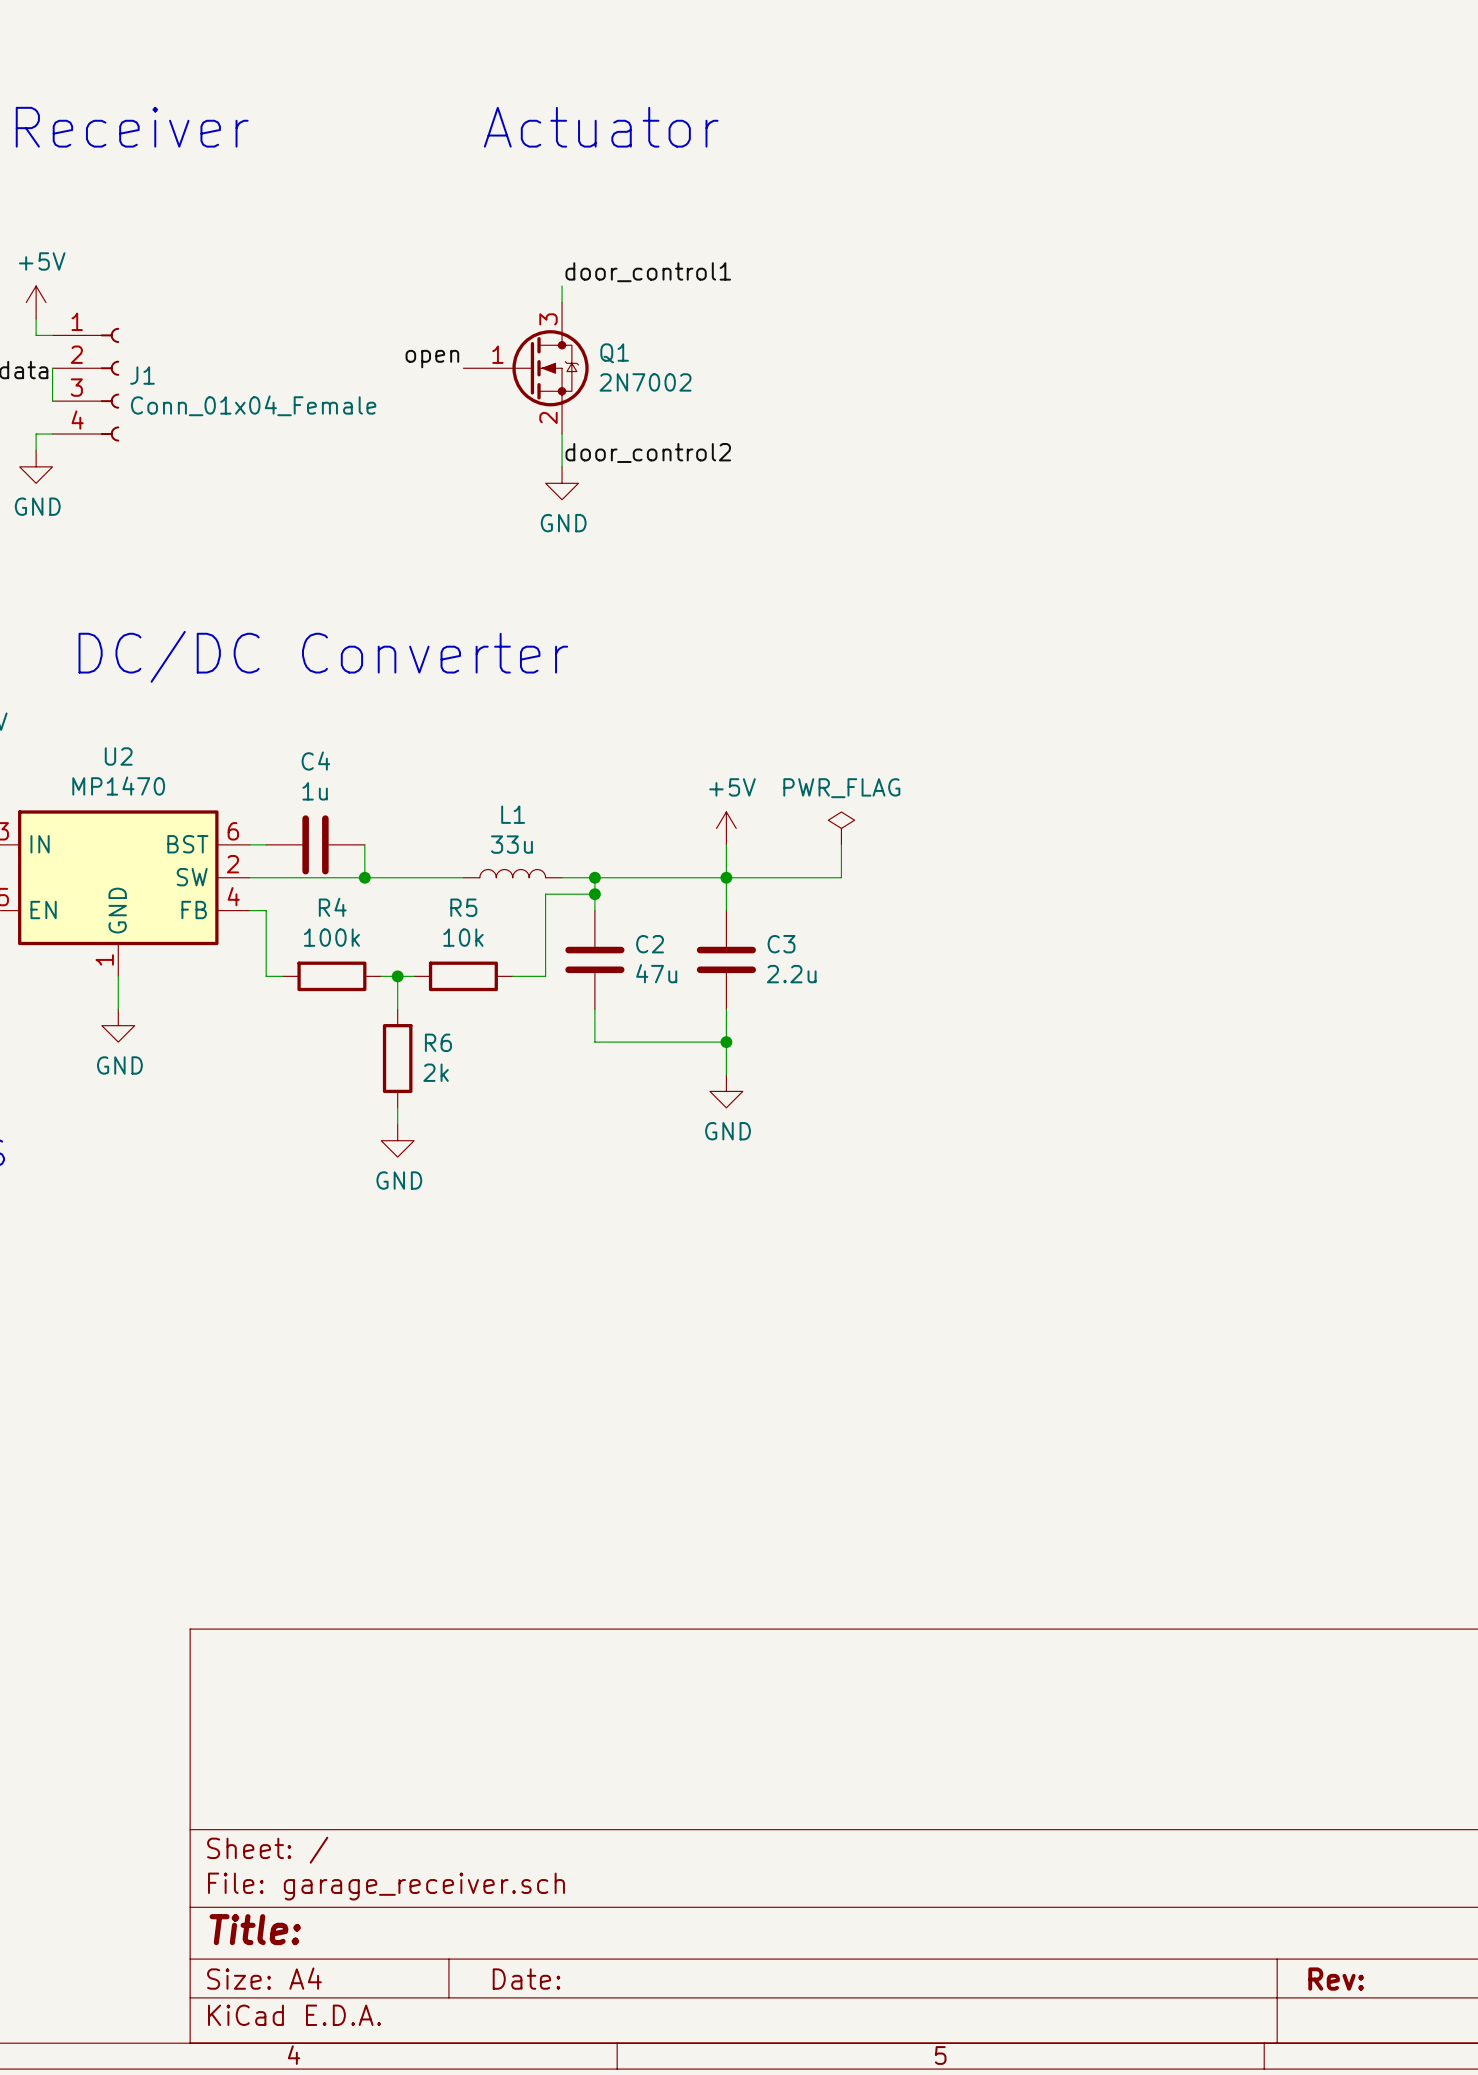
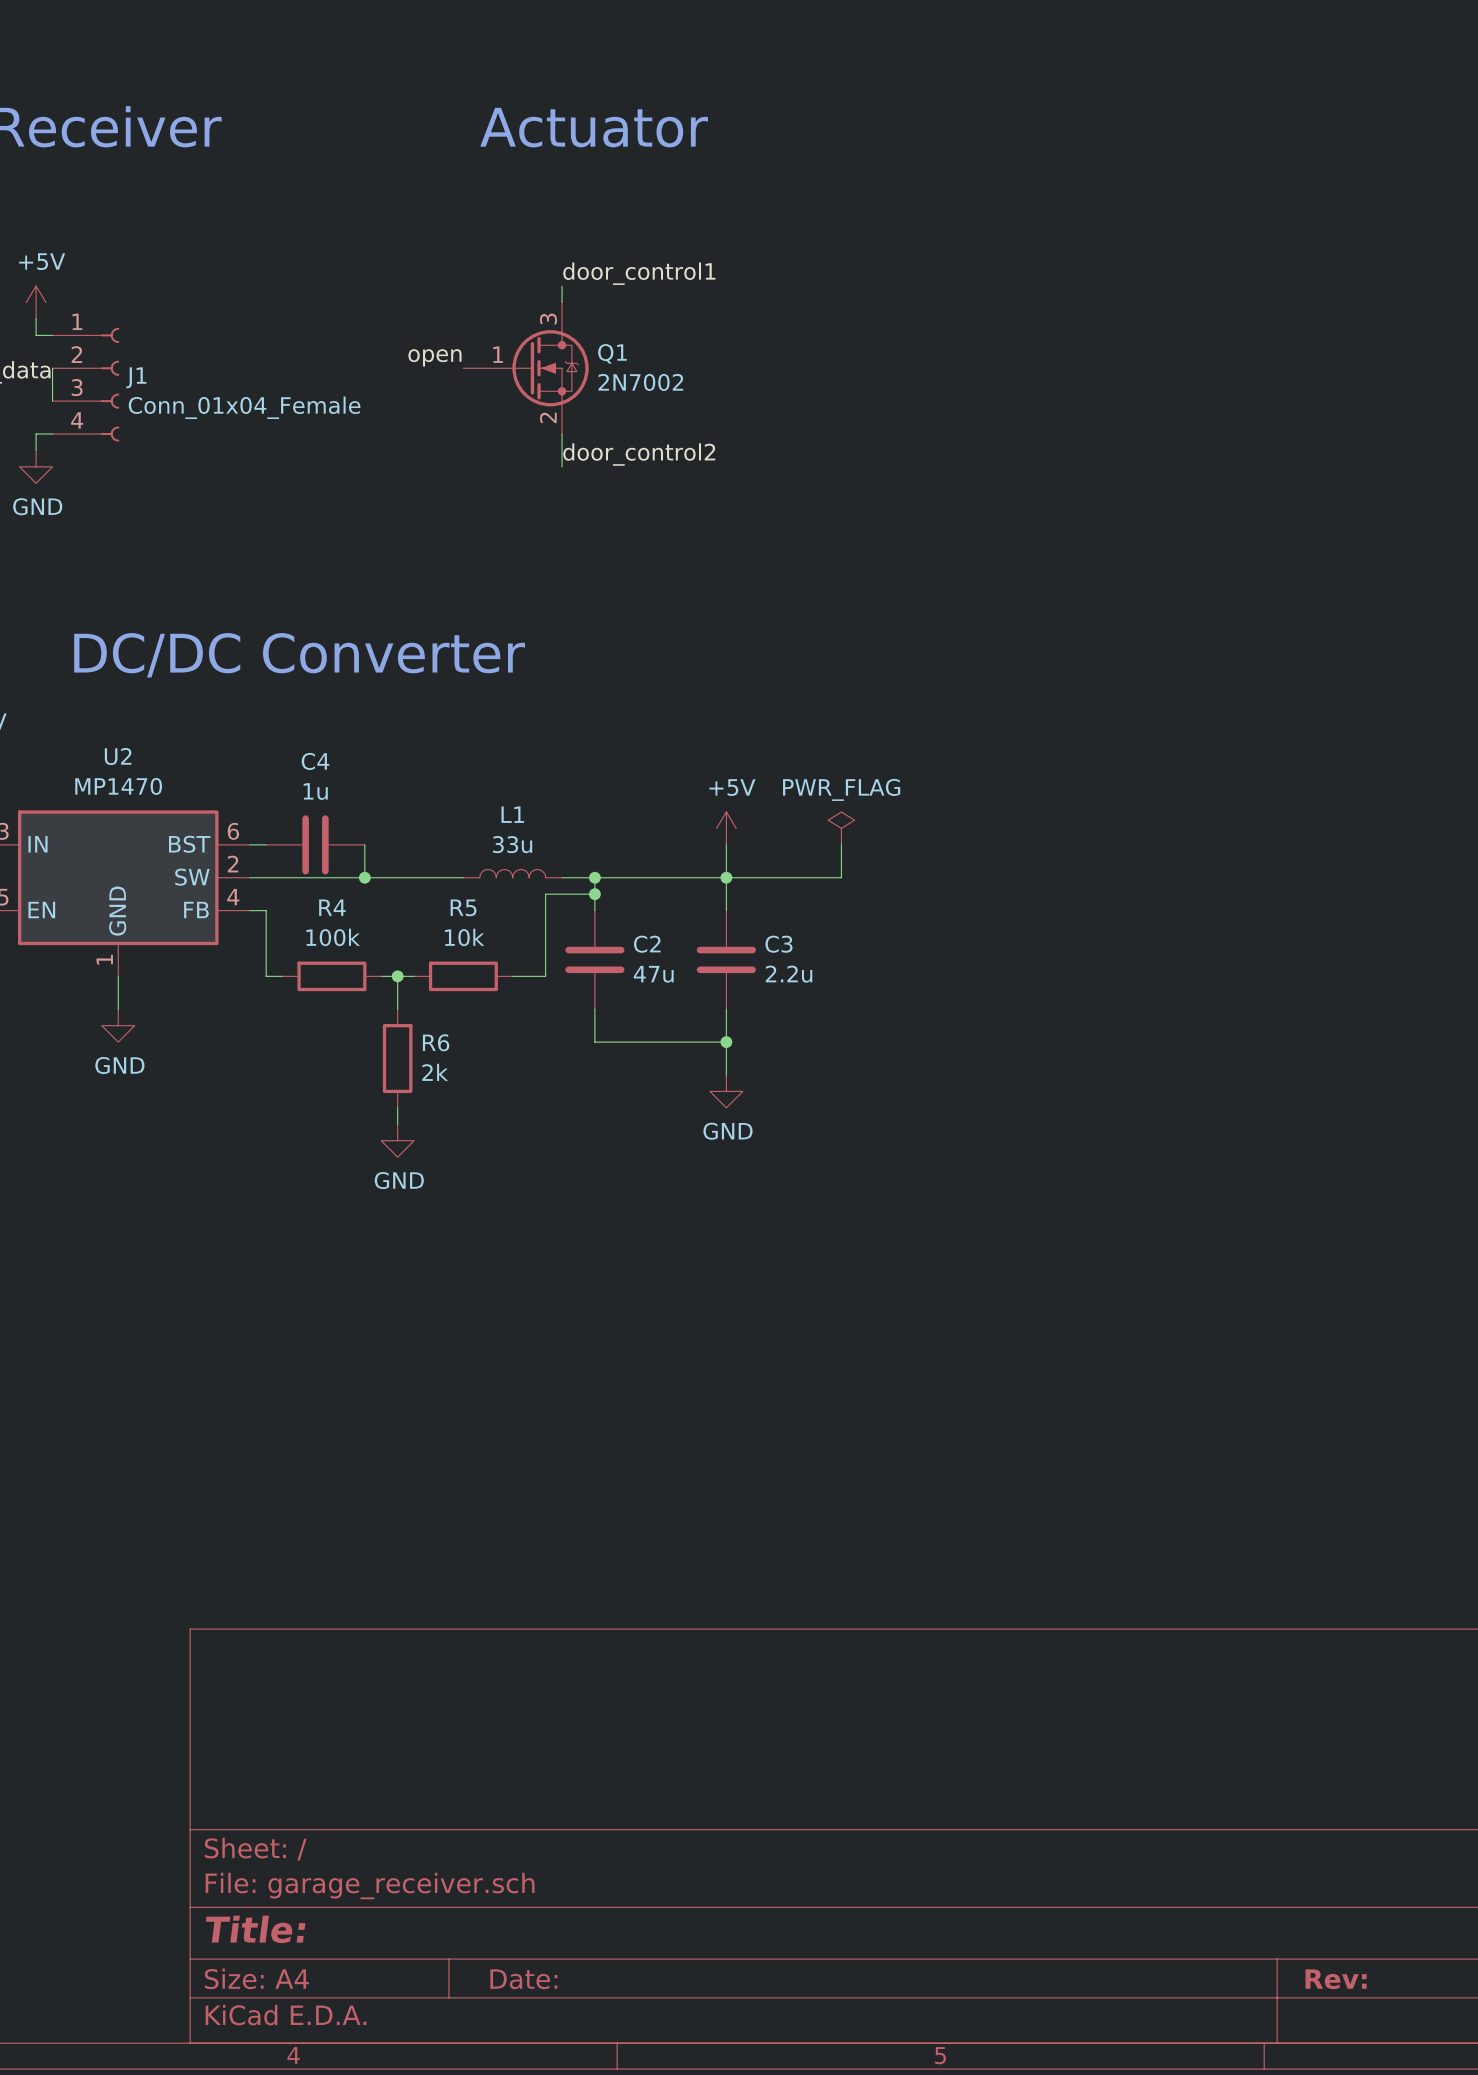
power symbol: GND (562, 483) -> none

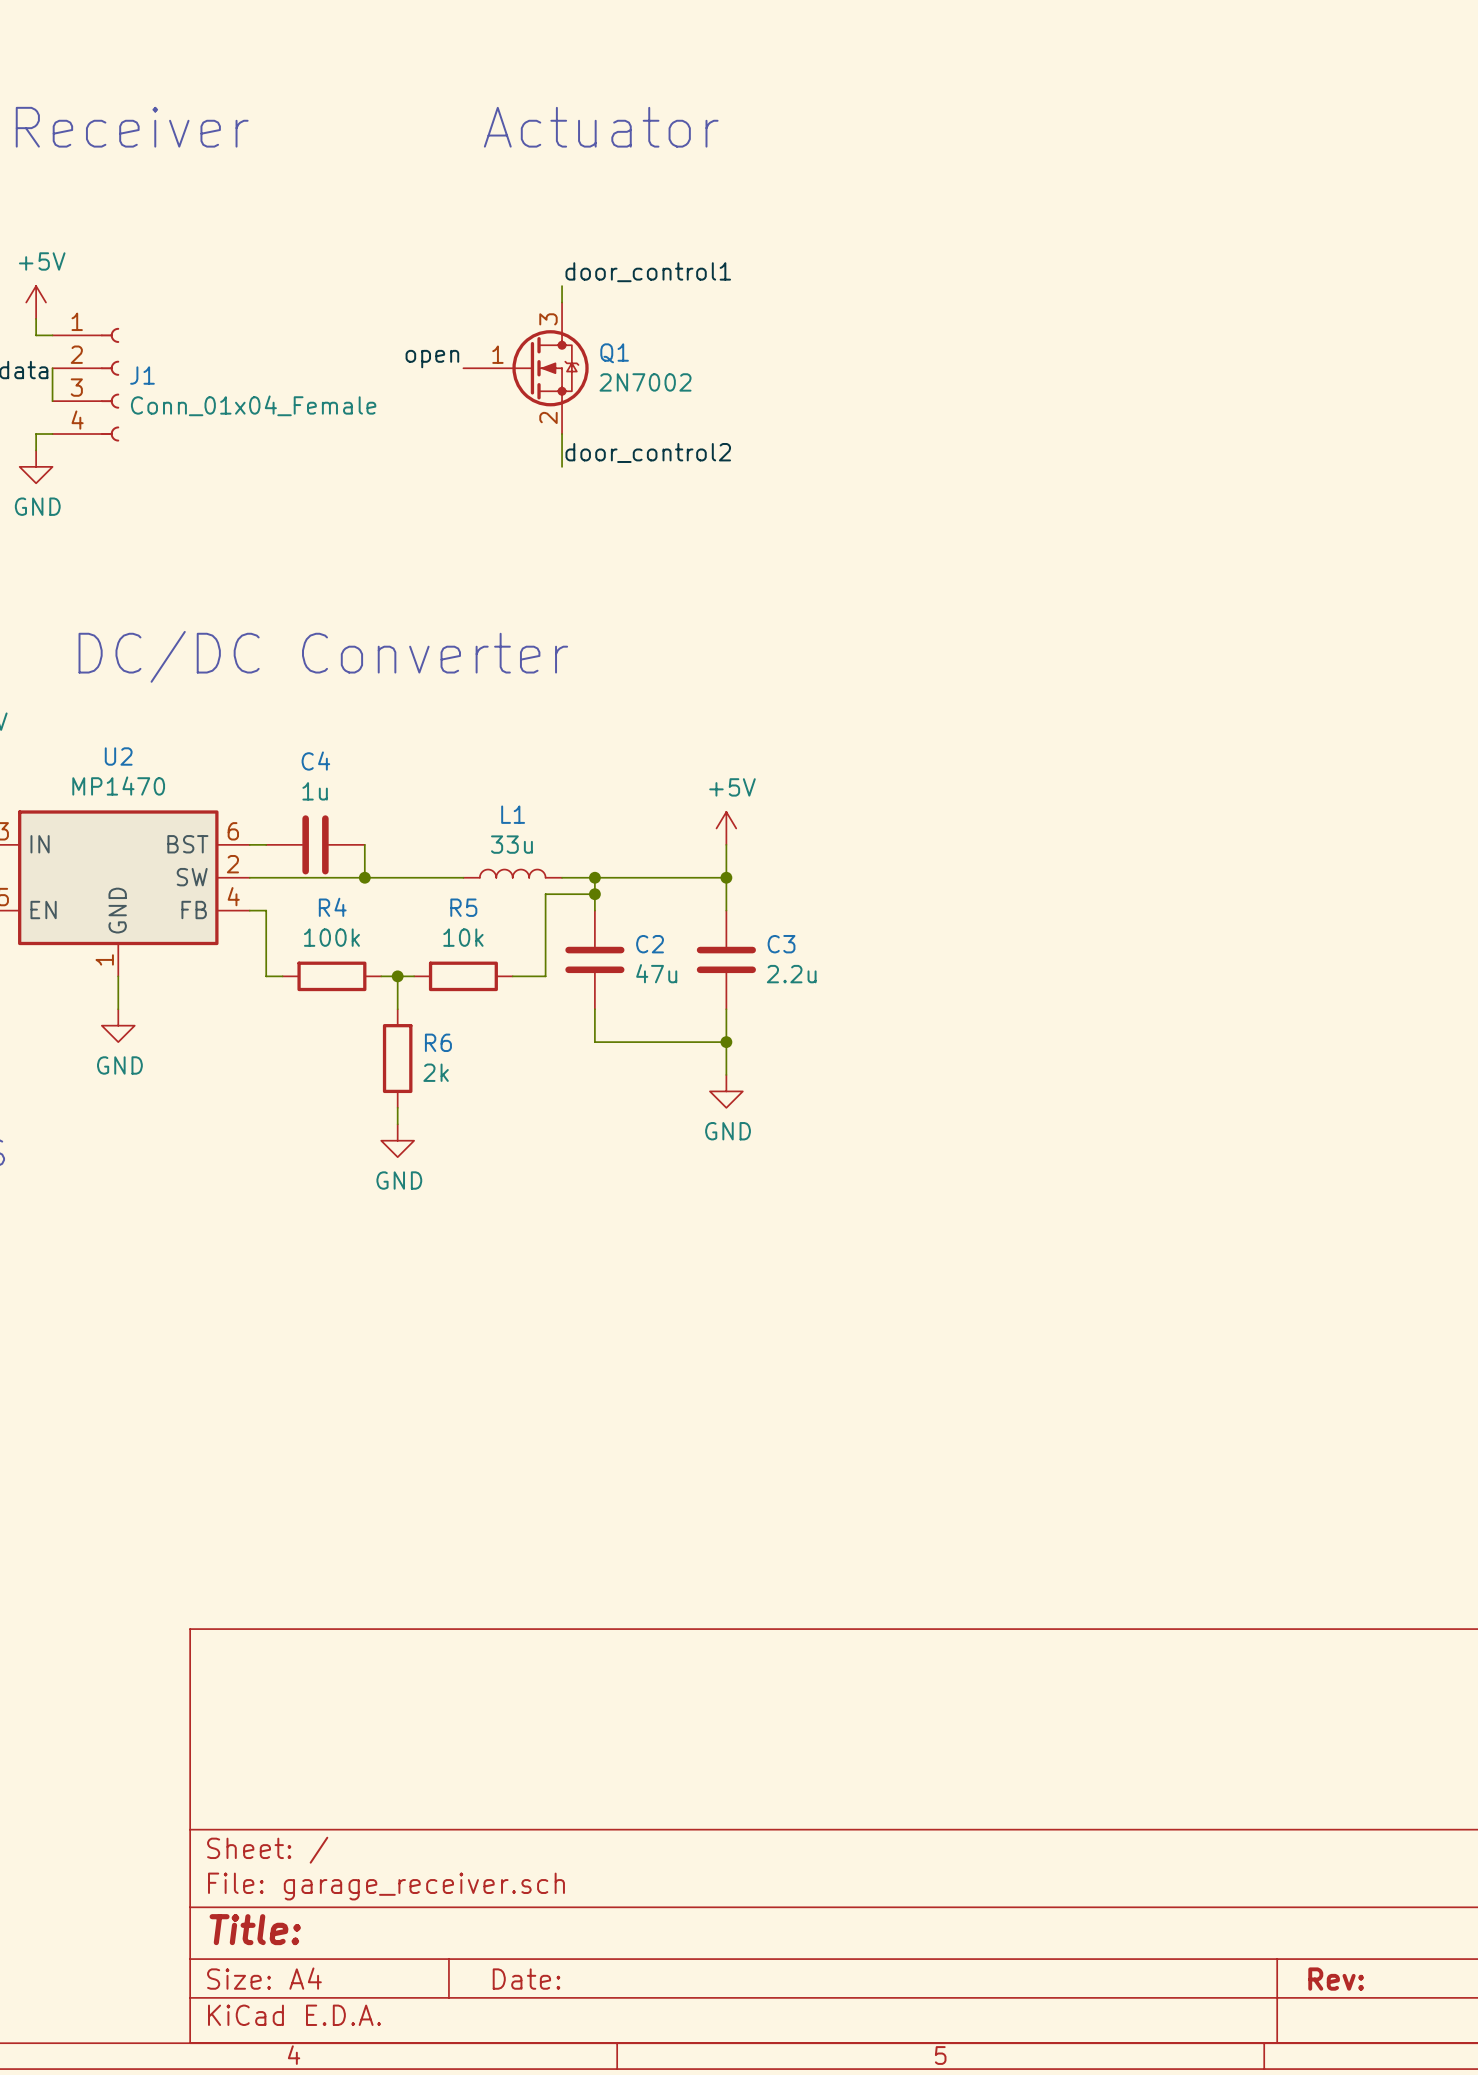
power symbol: PWR_FLAG (841, 828) -> none
wire: (841, 844) (841, 877) (726, 877) -> none

